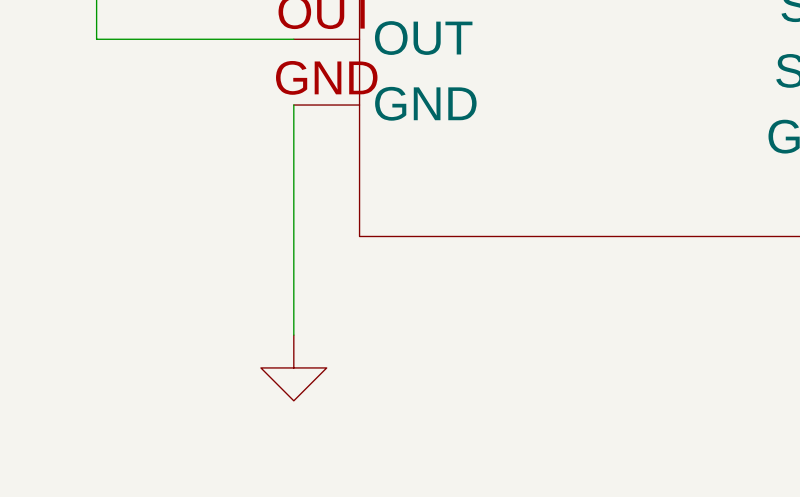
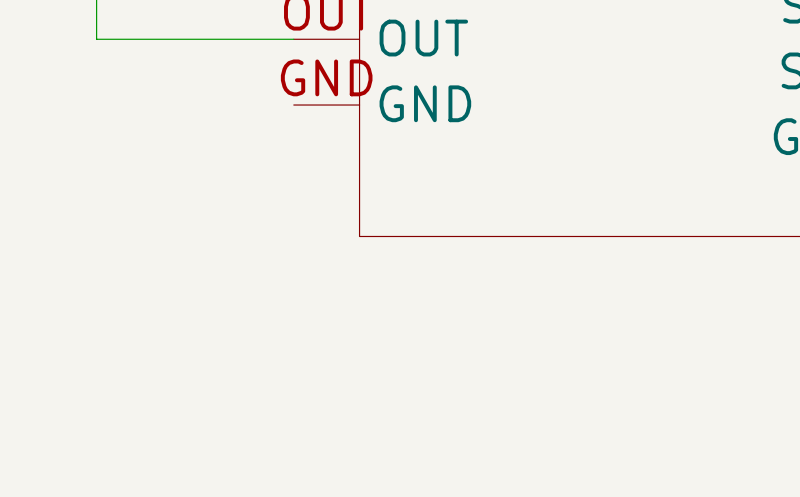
wire: (293, 105) (293, 335) -> none
power symbol: (293, 367) -> none

